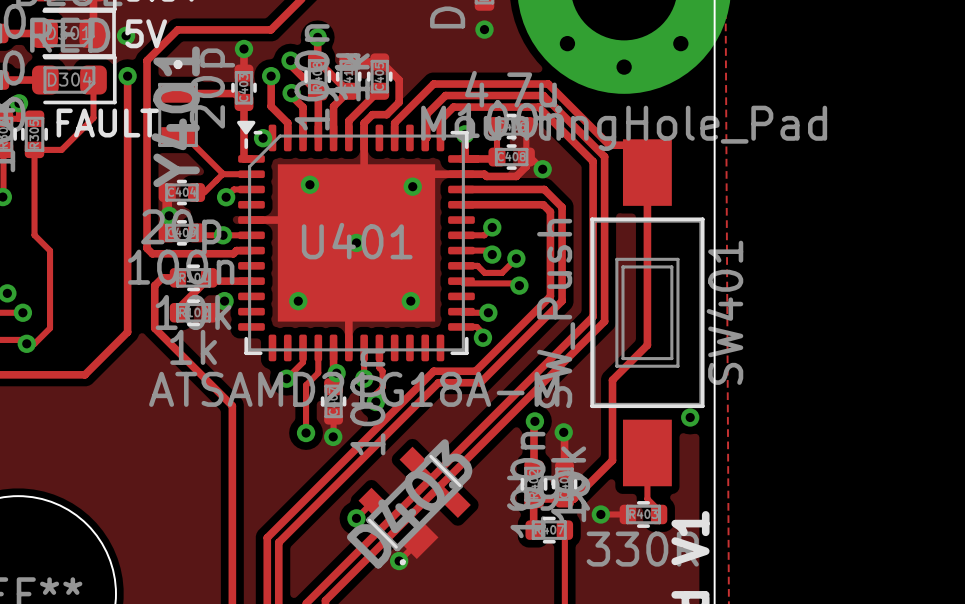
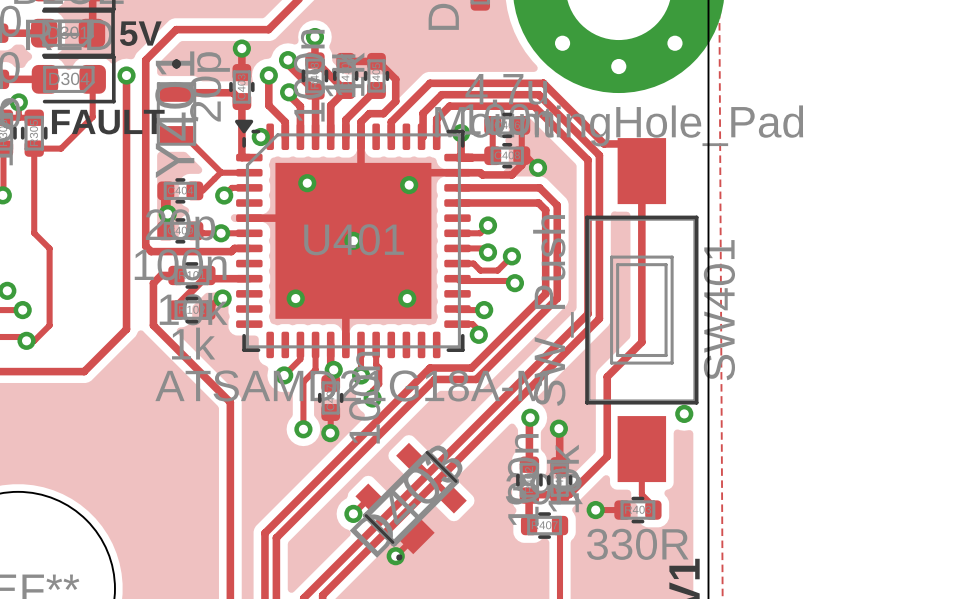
via: (484, 29) -> none
via: (126, 35) -> none

